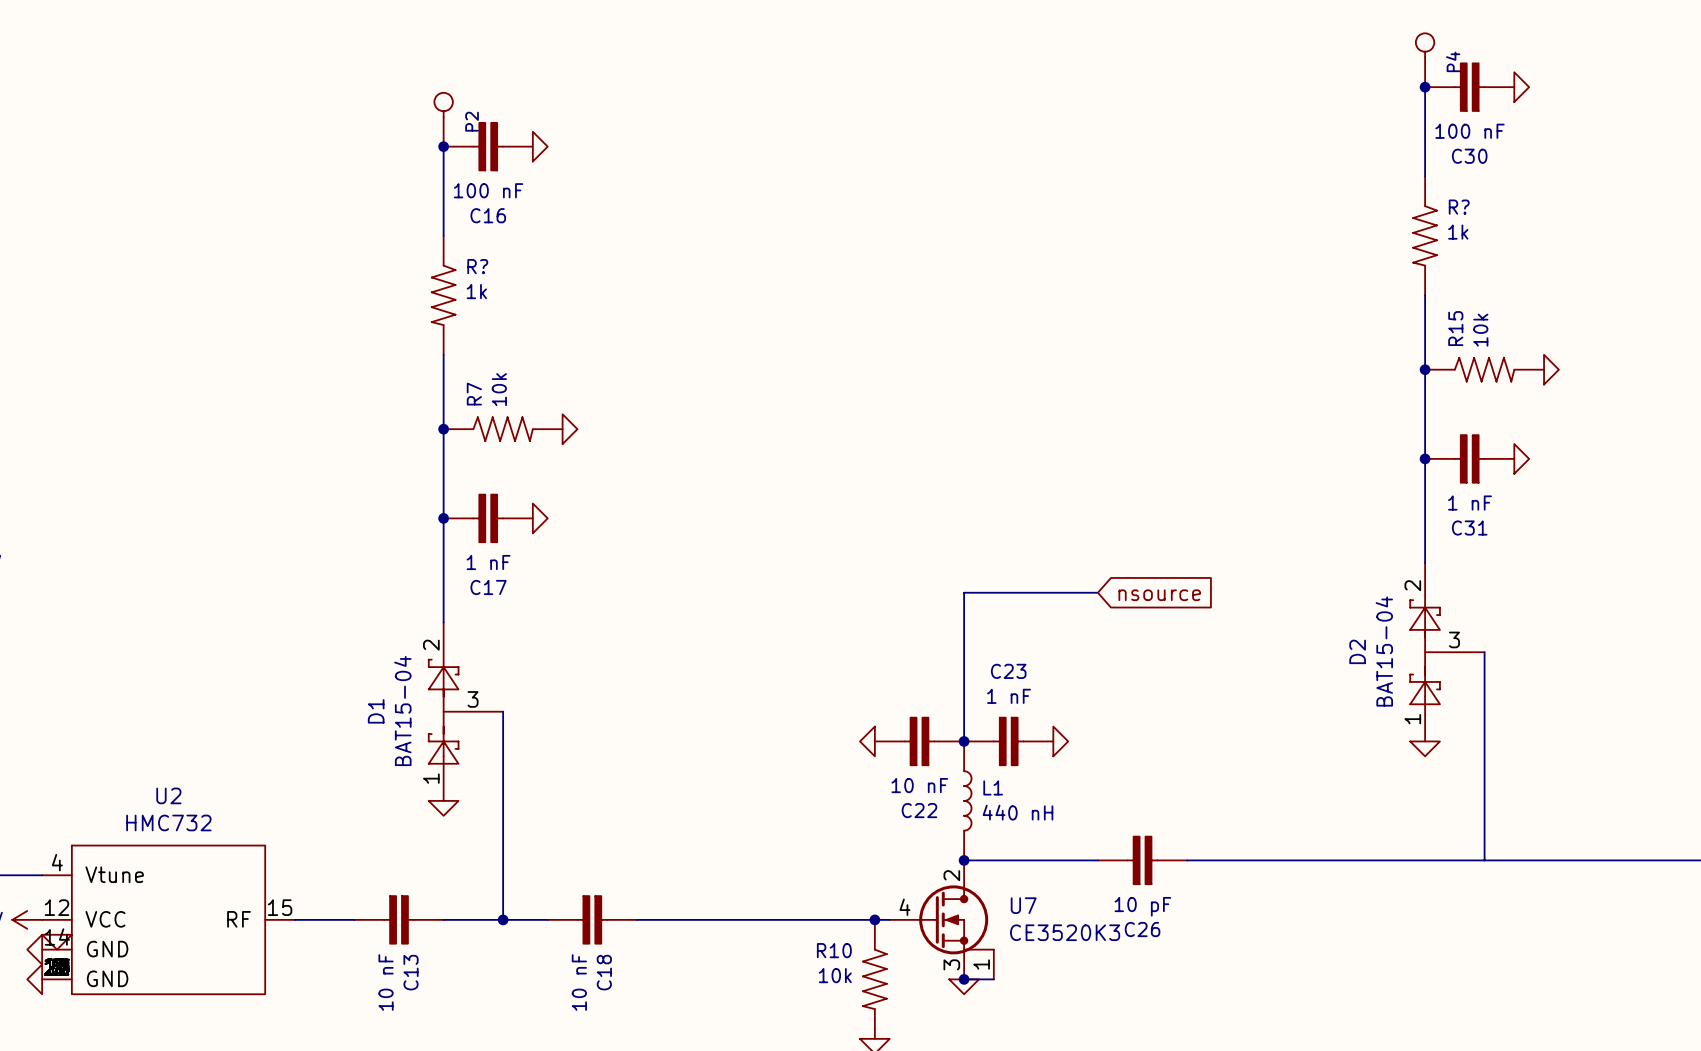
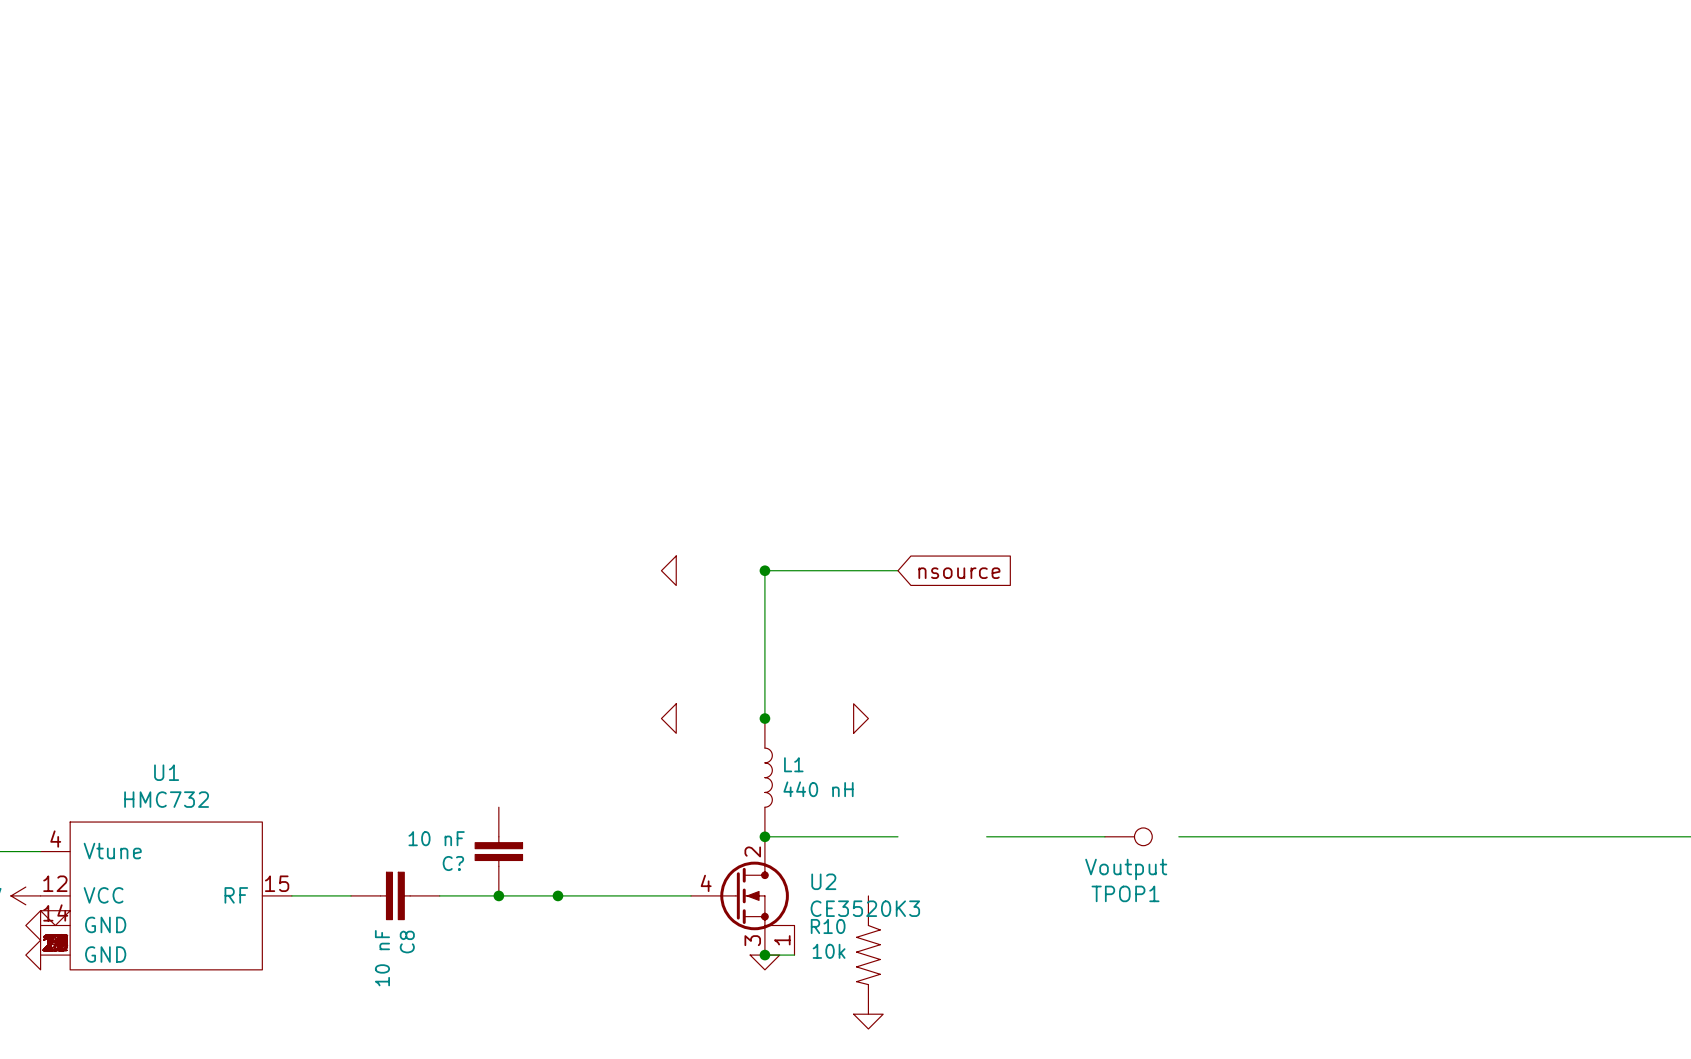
P4: (1425, 60) -> none
wire: (1425, 87) (1425, 176) -> none
junction: (1425, 87) -> none
C30: 100 nF (1469, 87) -> none
power symbol: (1521, 87) -> none
P2: (443, 119) -> none
wire: (443, 146) (443, 235) -> none
junction: (443, 146) -> none
C16: 100 nF (488, 146) -> none
power symbol: (540, 146) -> none
R?: 1k (1425, 235) -> none
R?: 1k (443, 295) -> none
wire: (1425, 295) (1425, 563) -> none
wire: (443, 354) (443, 622) -> none
junction: (1425, 369) -> none
R15: 10k (1484, 369) -> none
power symbol: (1551, 369) -> none
junction: (443, 429) -> none
R7: 10k (503, 429) -> none
power symbol: (570, 429) -> none
junction: (1425, 458) -> none
C31: 1 nF (1469, 458) -> none
power symbol: (1521, 458) -> none
junction: (443, 518) -> none
C17: 1 nF (488, 518) -> none
power symbol: (540, 518) -> none
power symbol: none -> (668, 570)
junction: none -> (764, 570)
wire: (1097, 592) (964, 592) (964, 741) -> (897, 570) (764, 570) (764, 718)
global label position: nsource (1159, 595) -> nsource (959, 573)
D2: BAT15-04 (1447, 652) -> none
wire: (1484, 652) (1484, 860) -> none
D1: BAT15-04 (465, 711) -> none
wire: (503, 711) (503, 919) -> none
power symbol: none -> (668, 718)
junction: none -> (764, 718)
power symbol rotation: 0° (867, 741) -> 180° (861, 718)
C22: 10 nF (919, 741) -> none
junction: (964, 741) -> none
C23: 1 nF (1008, 741) -> none
power symbol: (1060, 741) -> none
power symbol: (1425, 748) -> none
U2 name: U2 (168, 795) -> U1 (166, 772)
L1 position: (967, 800) -> (768, 777)
power symbol: (443, 808) -> none
wire: none -> (764, 836) (897, 836)
junction: none -> (764, 836)
wire: (964, 860) (993, 860) -> none
junction: (964, 860) -> none
TPOP1: none -> Voutput (1128, 836)
C26: 10 pF (1142, 860) -> none
C?: none -> 10 nF (498, 851)
junction: none -> (557, 895)
C18: 10 nF (592, 919) -> none
wire: (696, 919) (889, 919) -> none
U2: none -> CE3520K3 (742, 895)
junction: (874, 919) -> none
U7: CE3520K3 (941, 919) -> none
C13 name: C13 (411, 972) -> C8 (407, 942)
junction: none -> (764, 955)
wire: (964, 979) (993, 979) -> (764, 955) (794, 955)
junction: (964, 979) -> none
power symbol: none -> (764, 962)
power symbol: (964, 986) -> none

